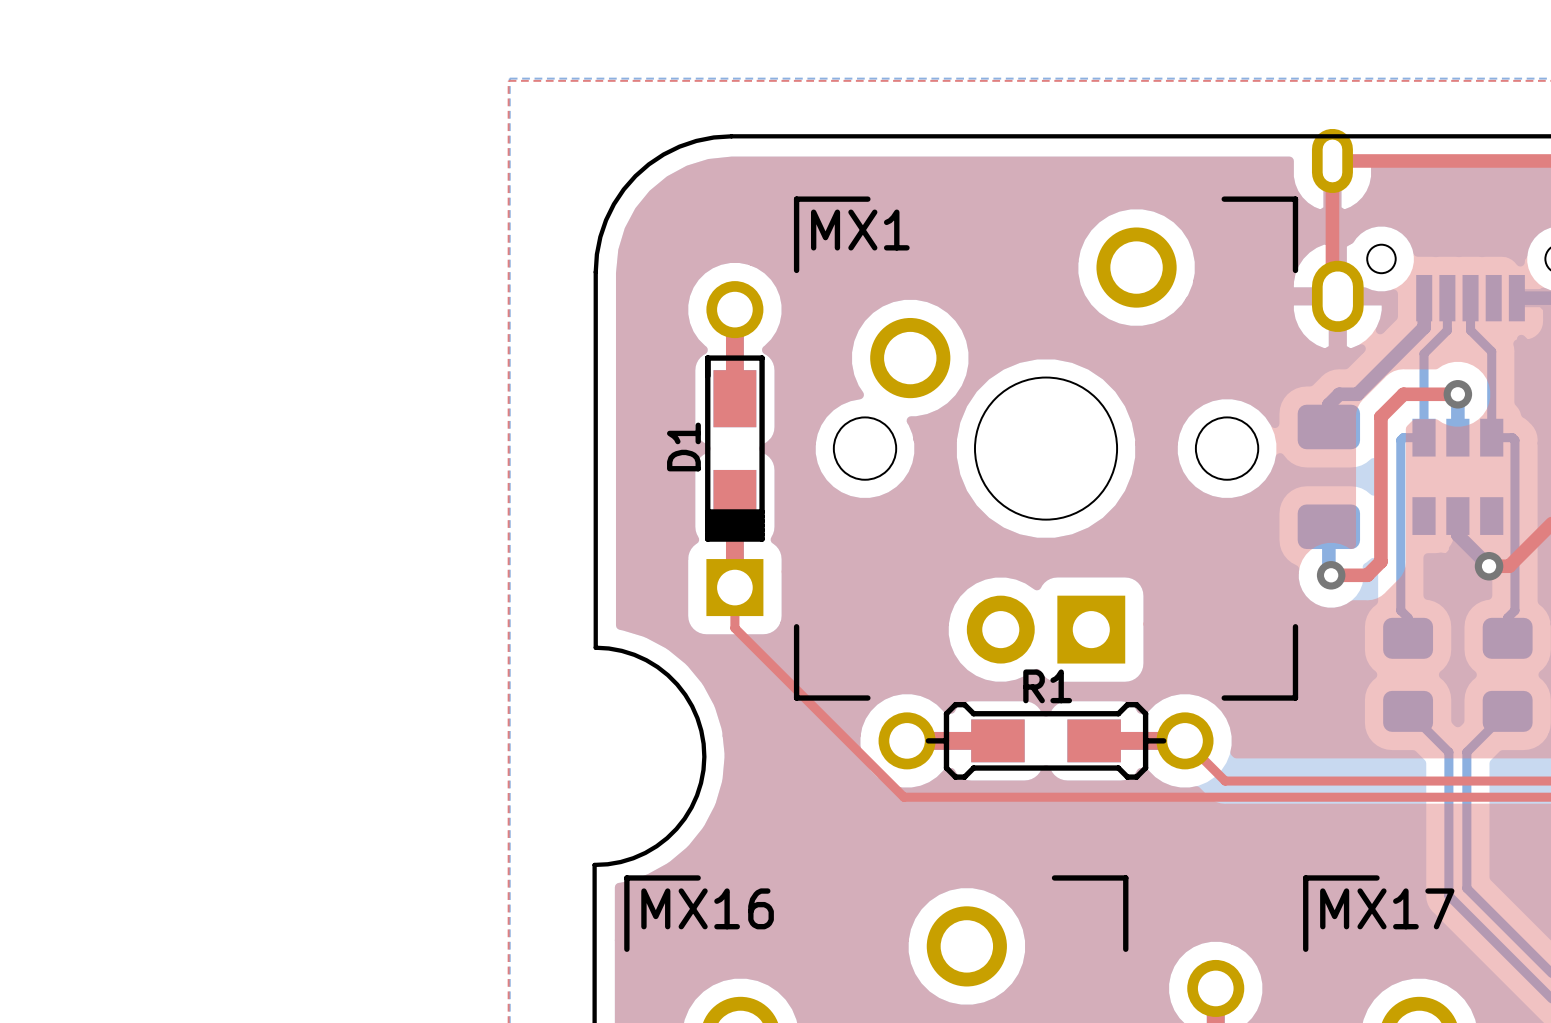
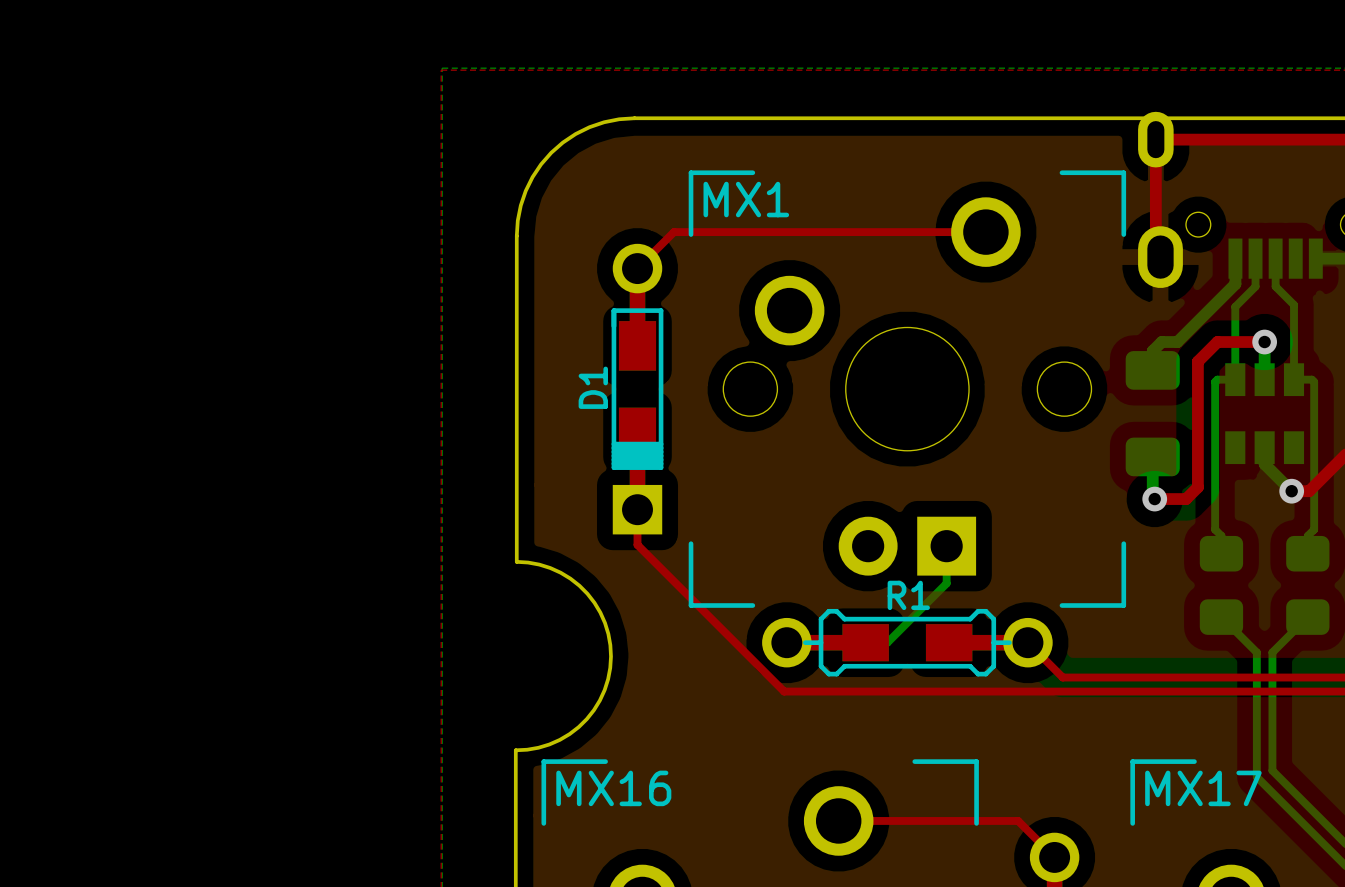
top track: none -> (985, 232) (673, 232) (637, 268)
bottom track: none -> (946, 546) (946, 583) (887, 642) (865, 642)
top track: none -> (838, 820) (1018, 820) (1054, 857)

